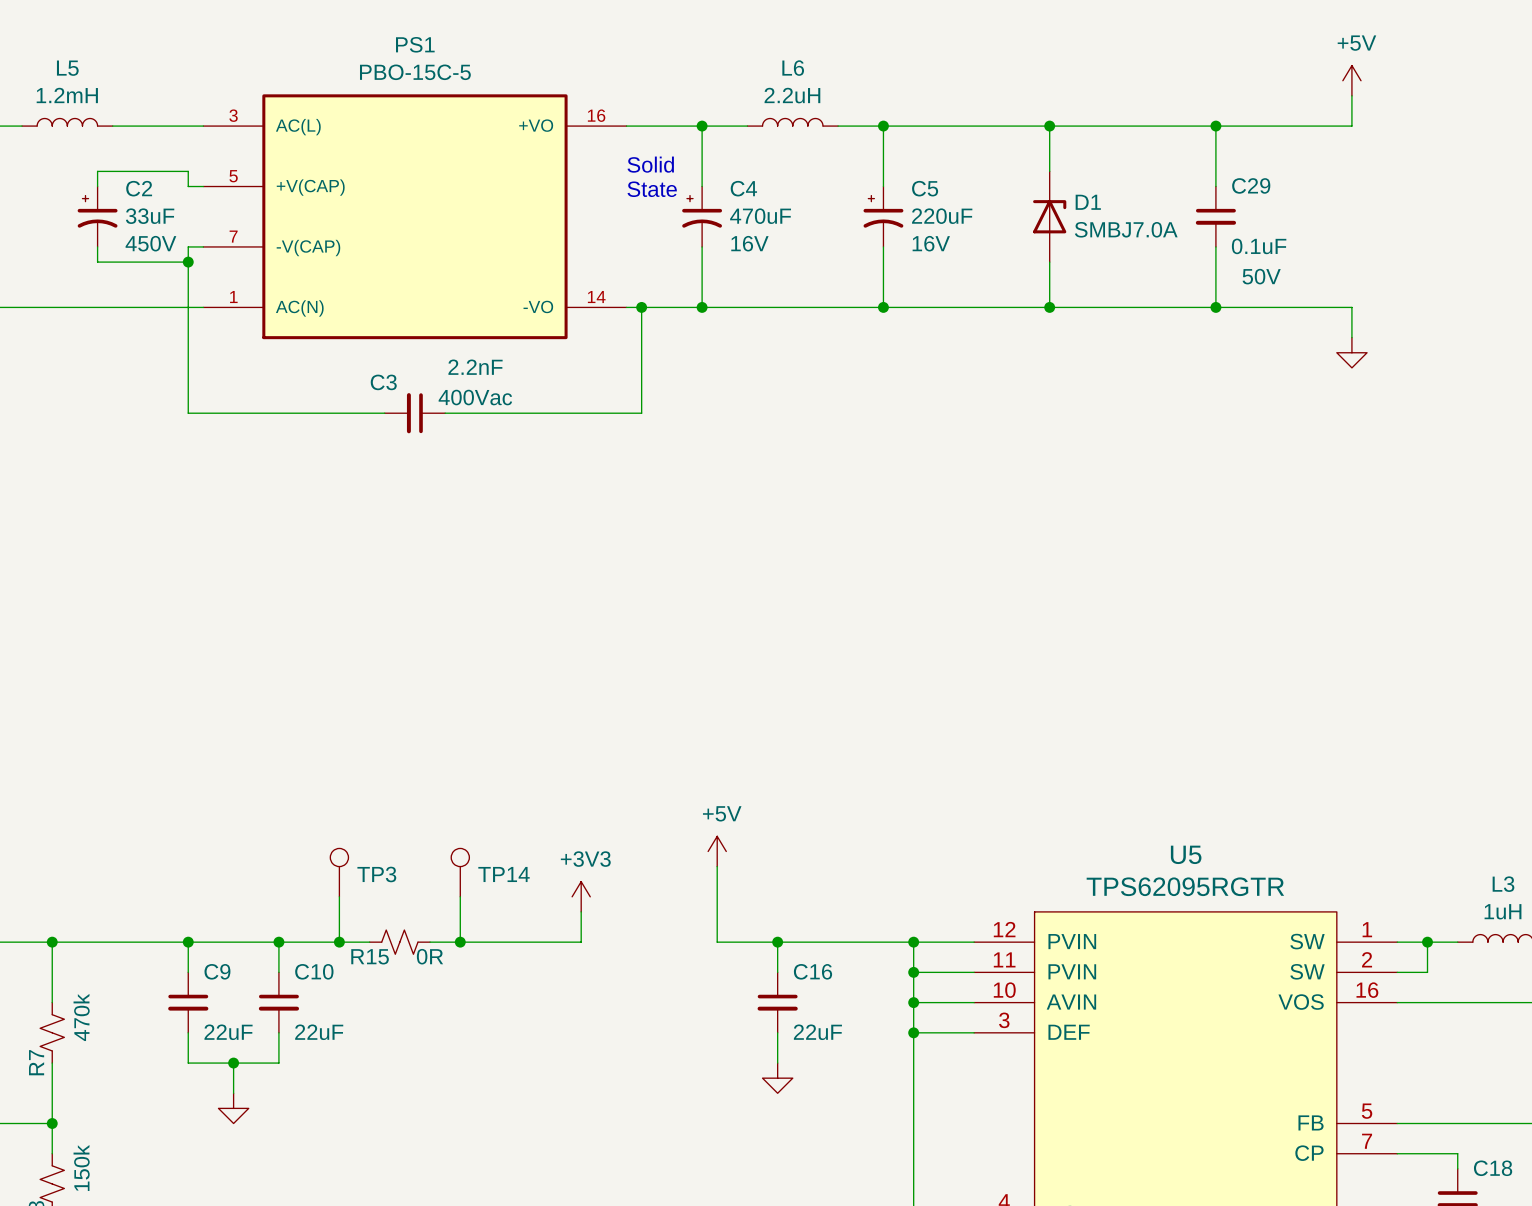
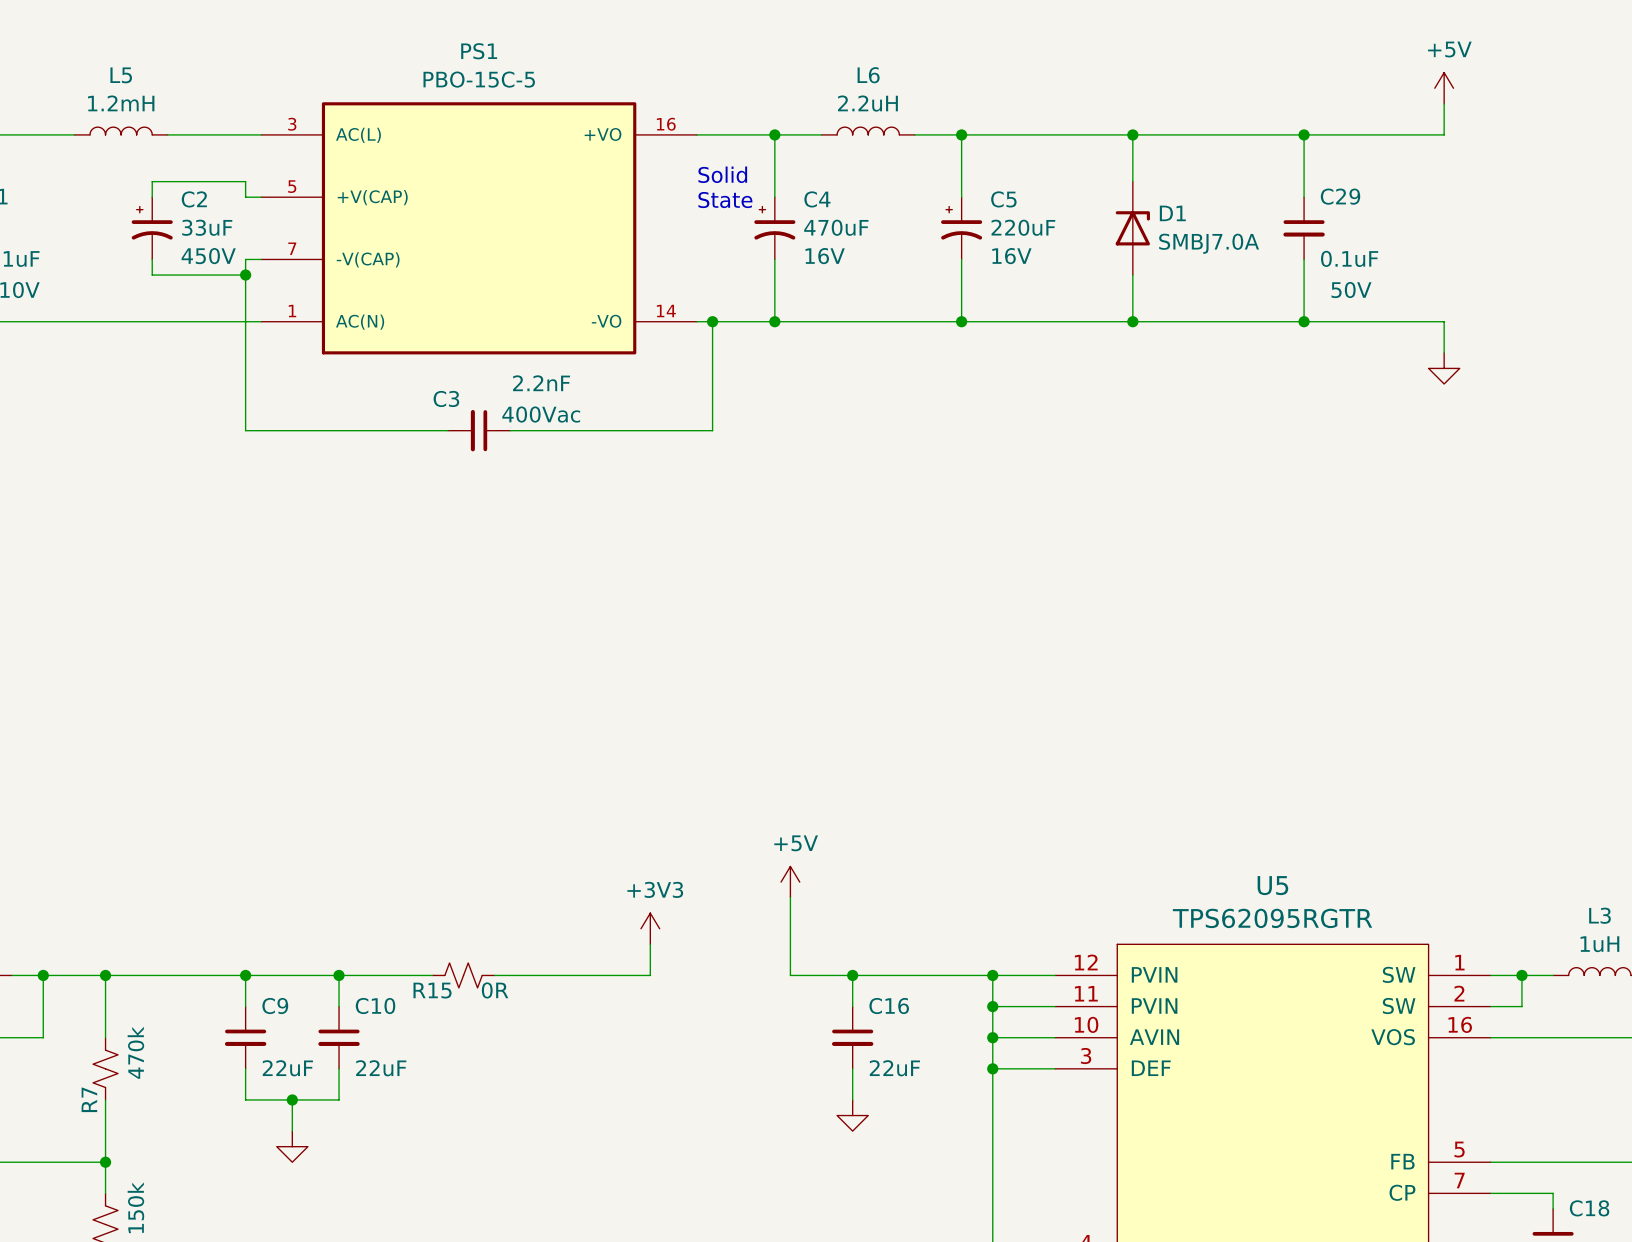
TP3: (339, 872) -> none
TP14: (460, 872) -> none
wire: (339, 896) (339, 942) -> none
wire: (460, 896) (460, 942) -> none
junction: (339, 942) -> none
junction: (460, 942) -> none

